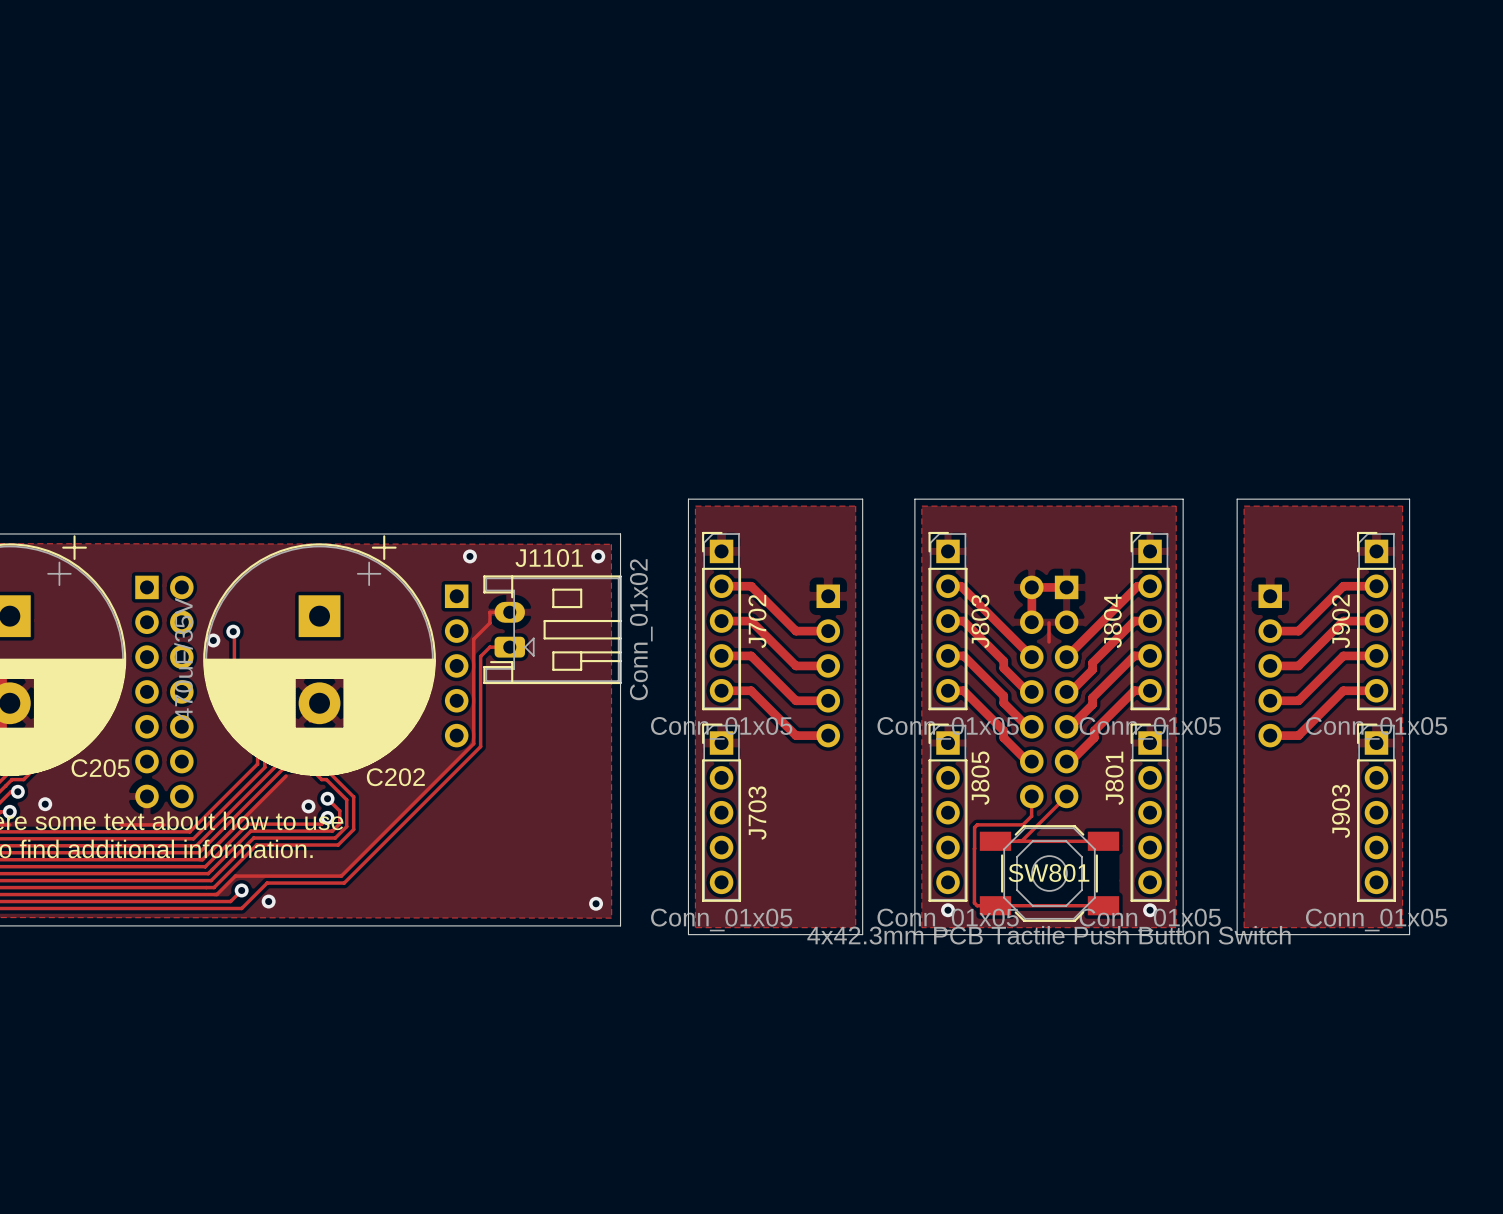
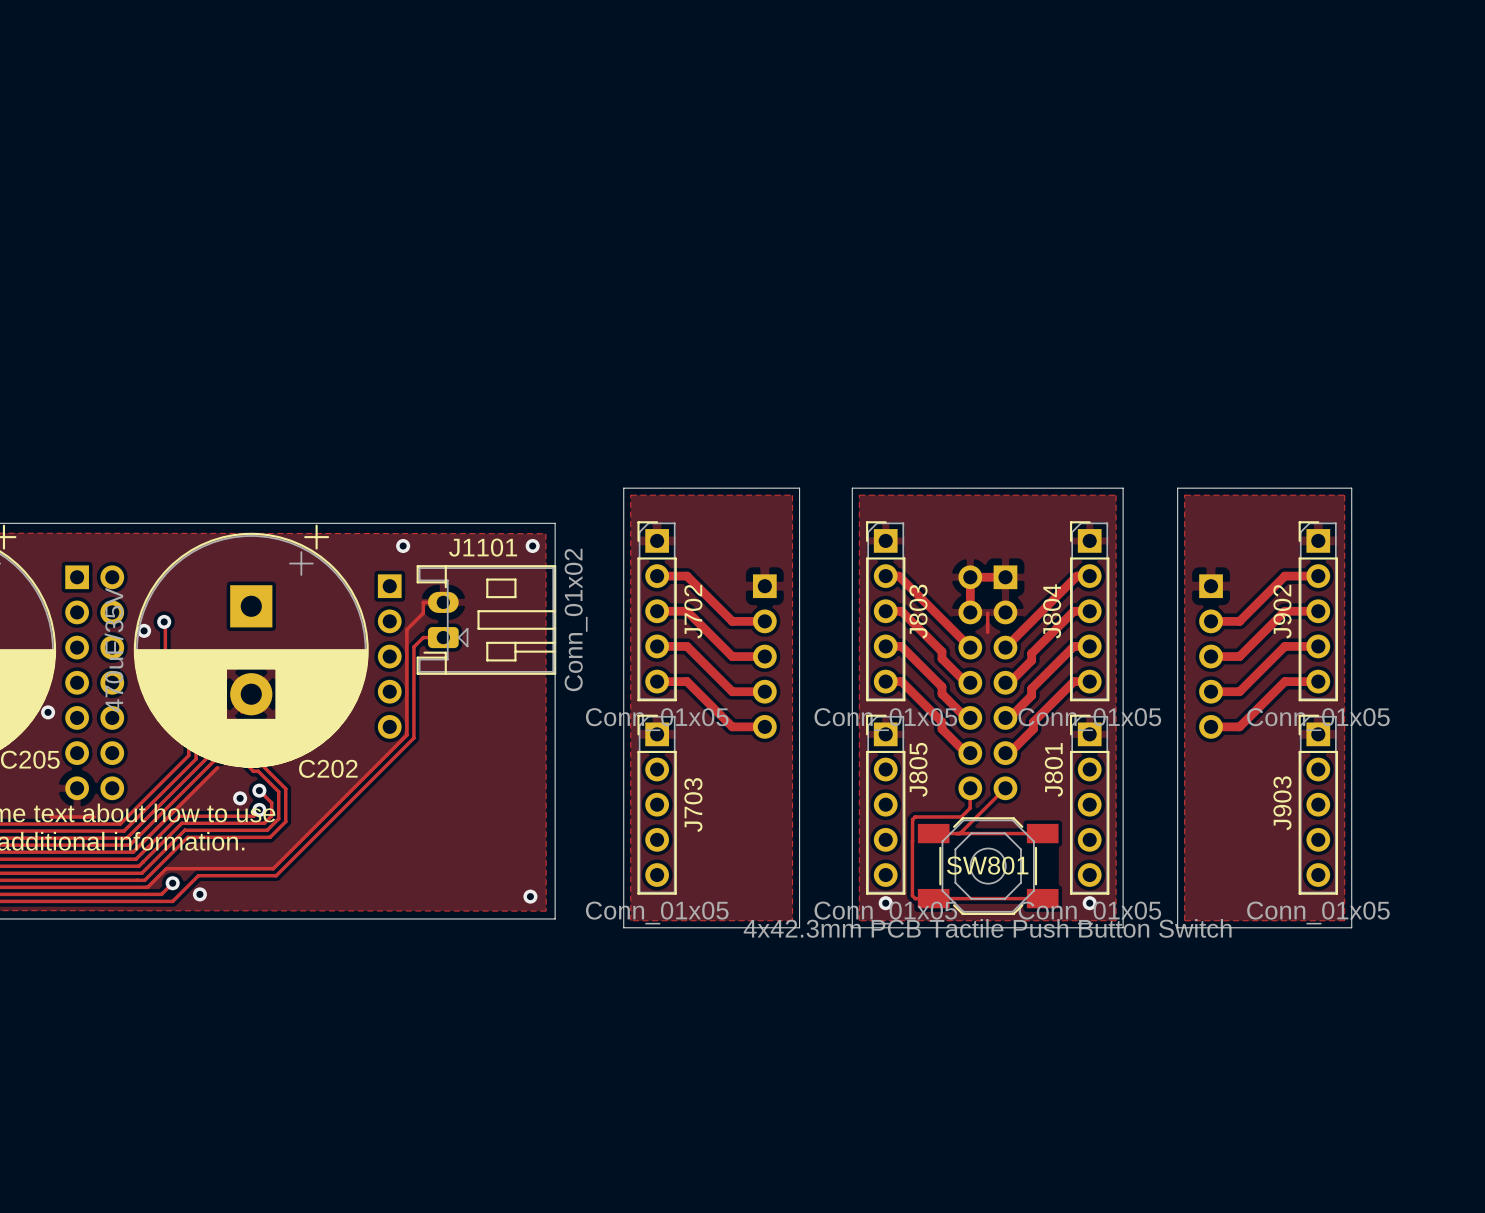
via: none -> (48, 712)

